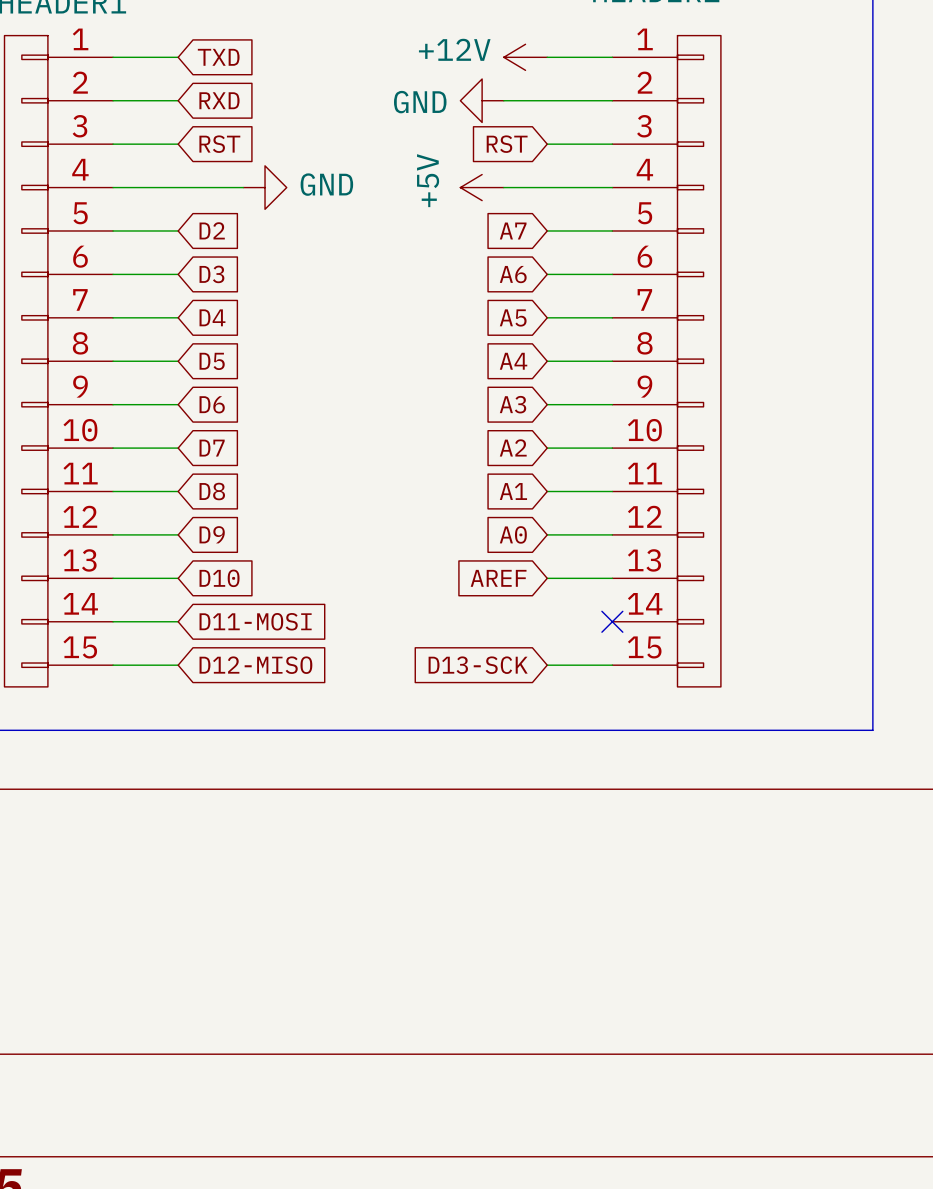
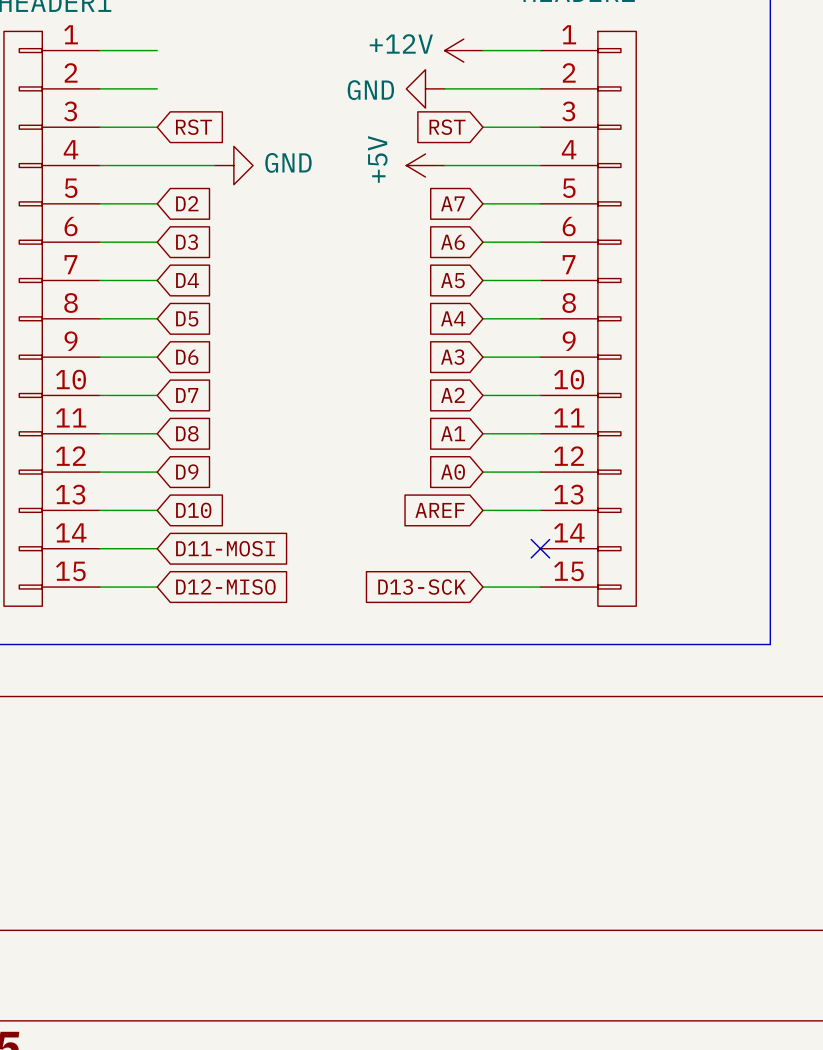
global label: TXD (218, 57) -> none
global label: RXD (219, 100) -> none

